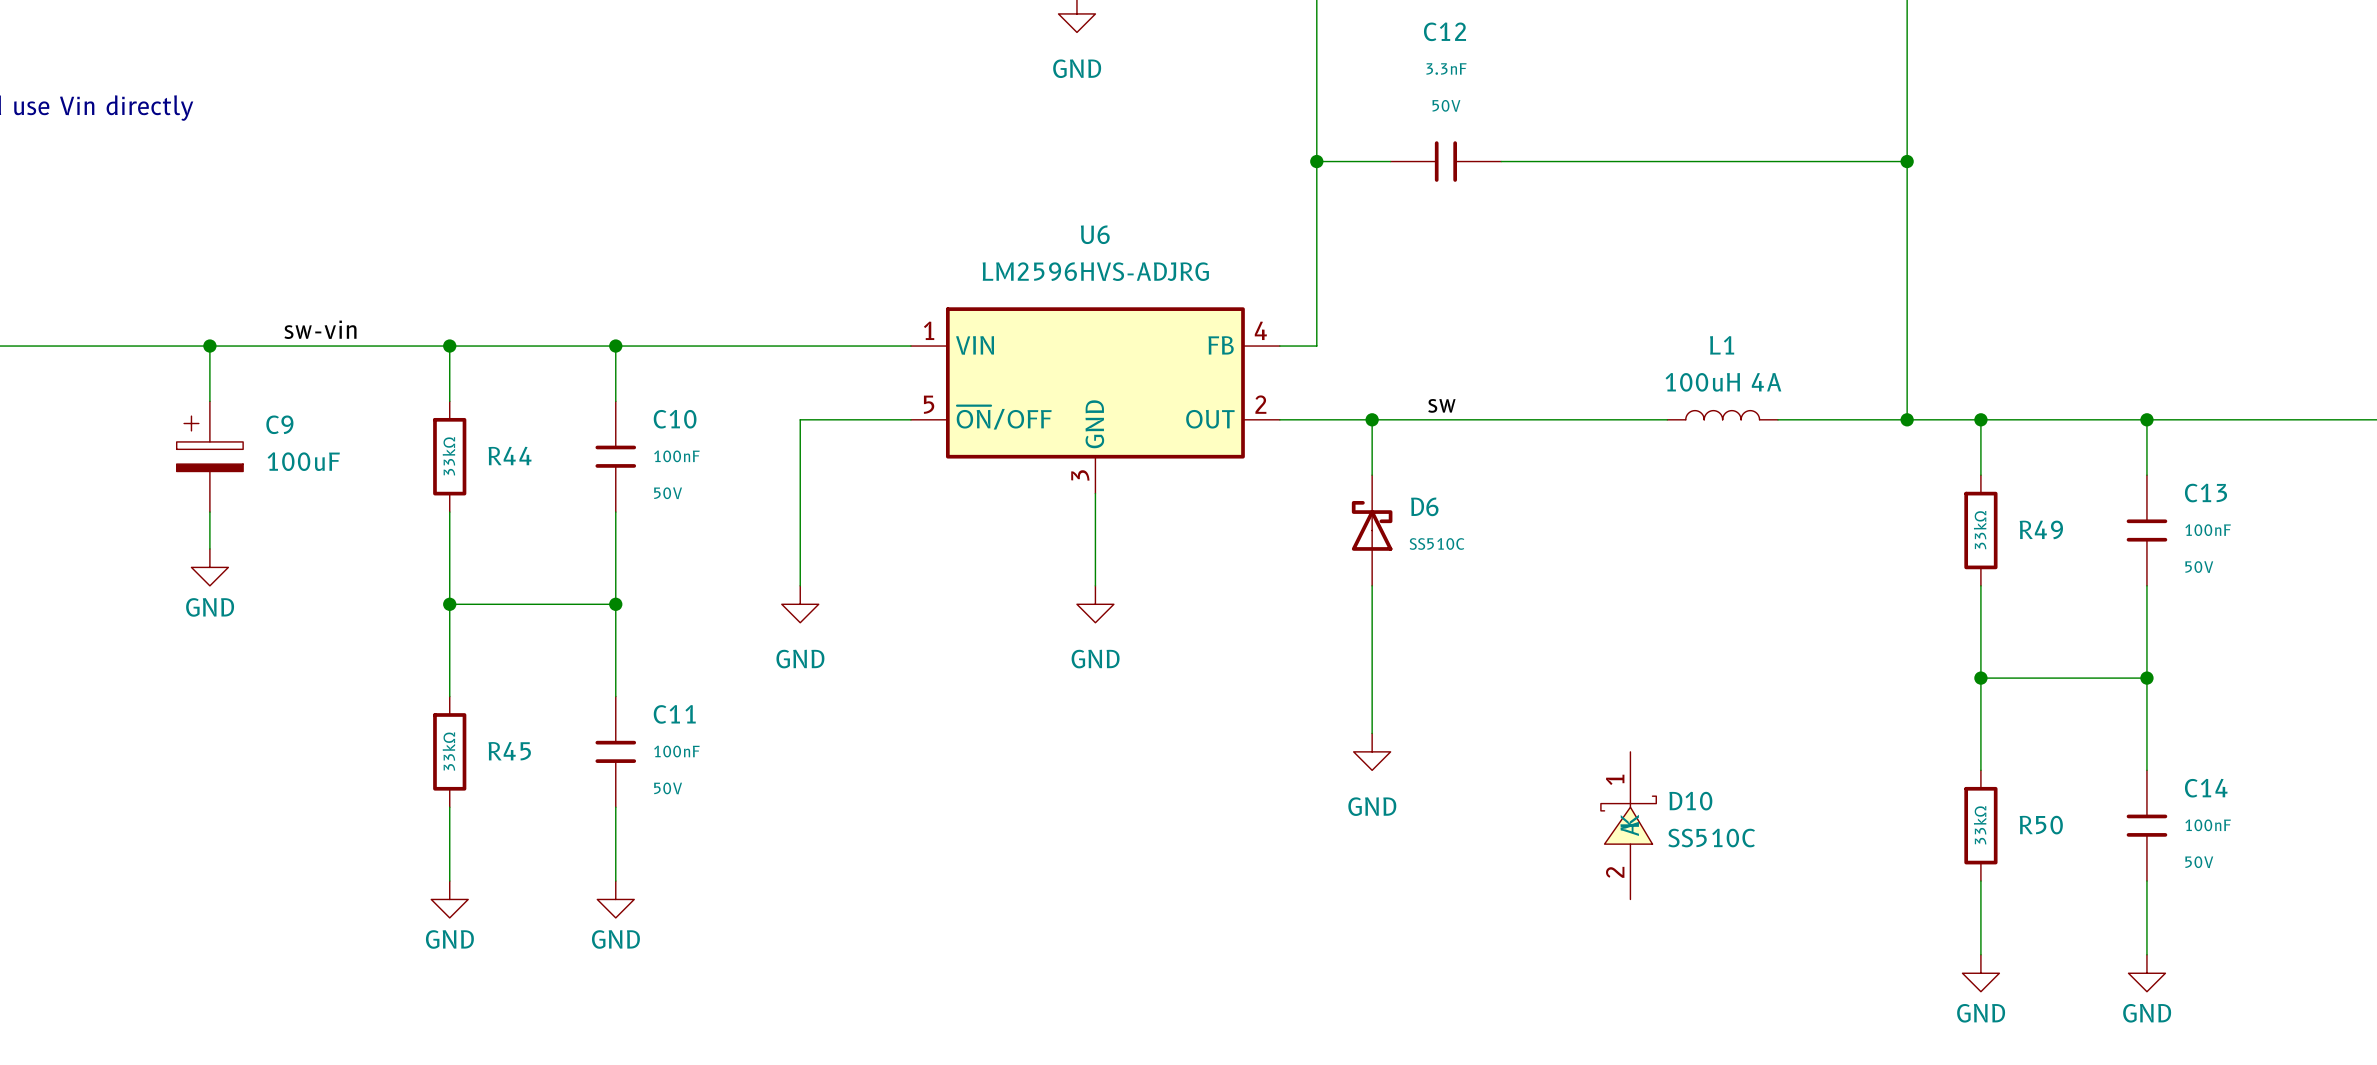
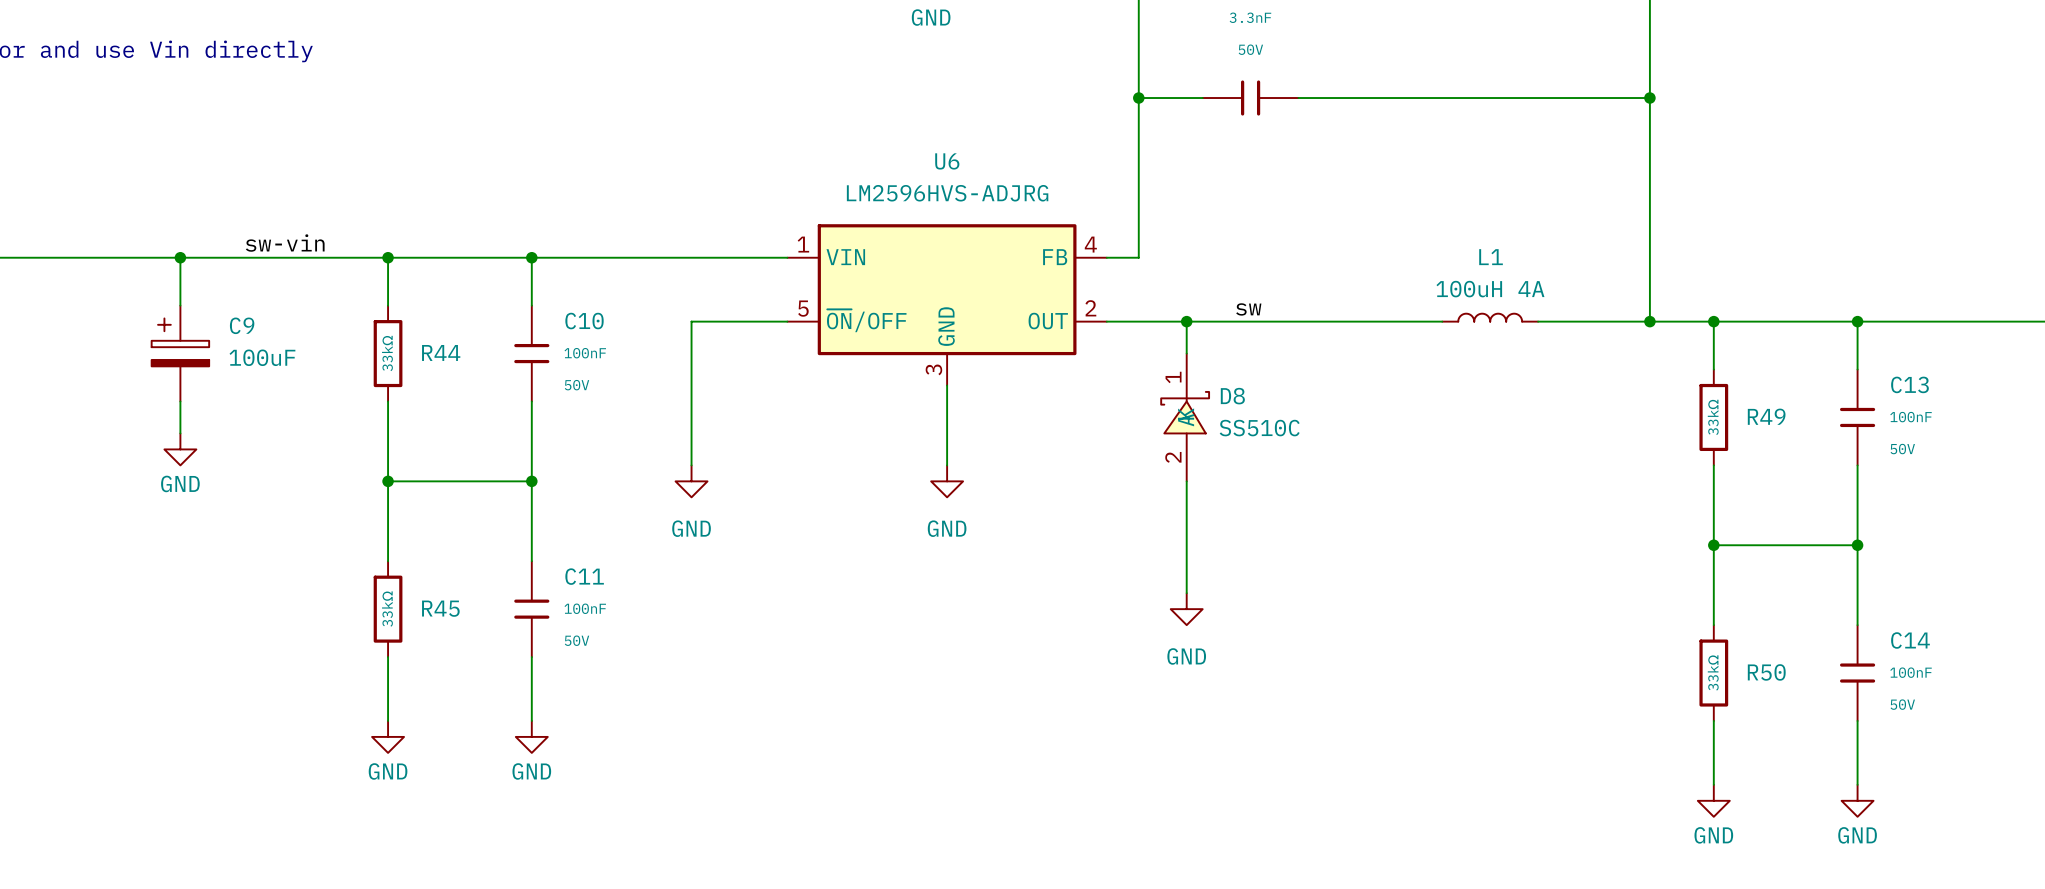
D8: none -> SS510C (1185, 417)
D6: SS510C (1372, 530) -> none
D10: SS510C (1628, 825) -> none

